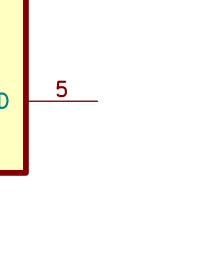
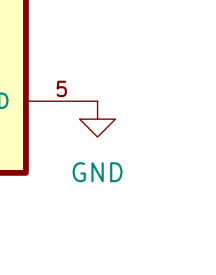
power symbol: none -> GND (97, 119)

